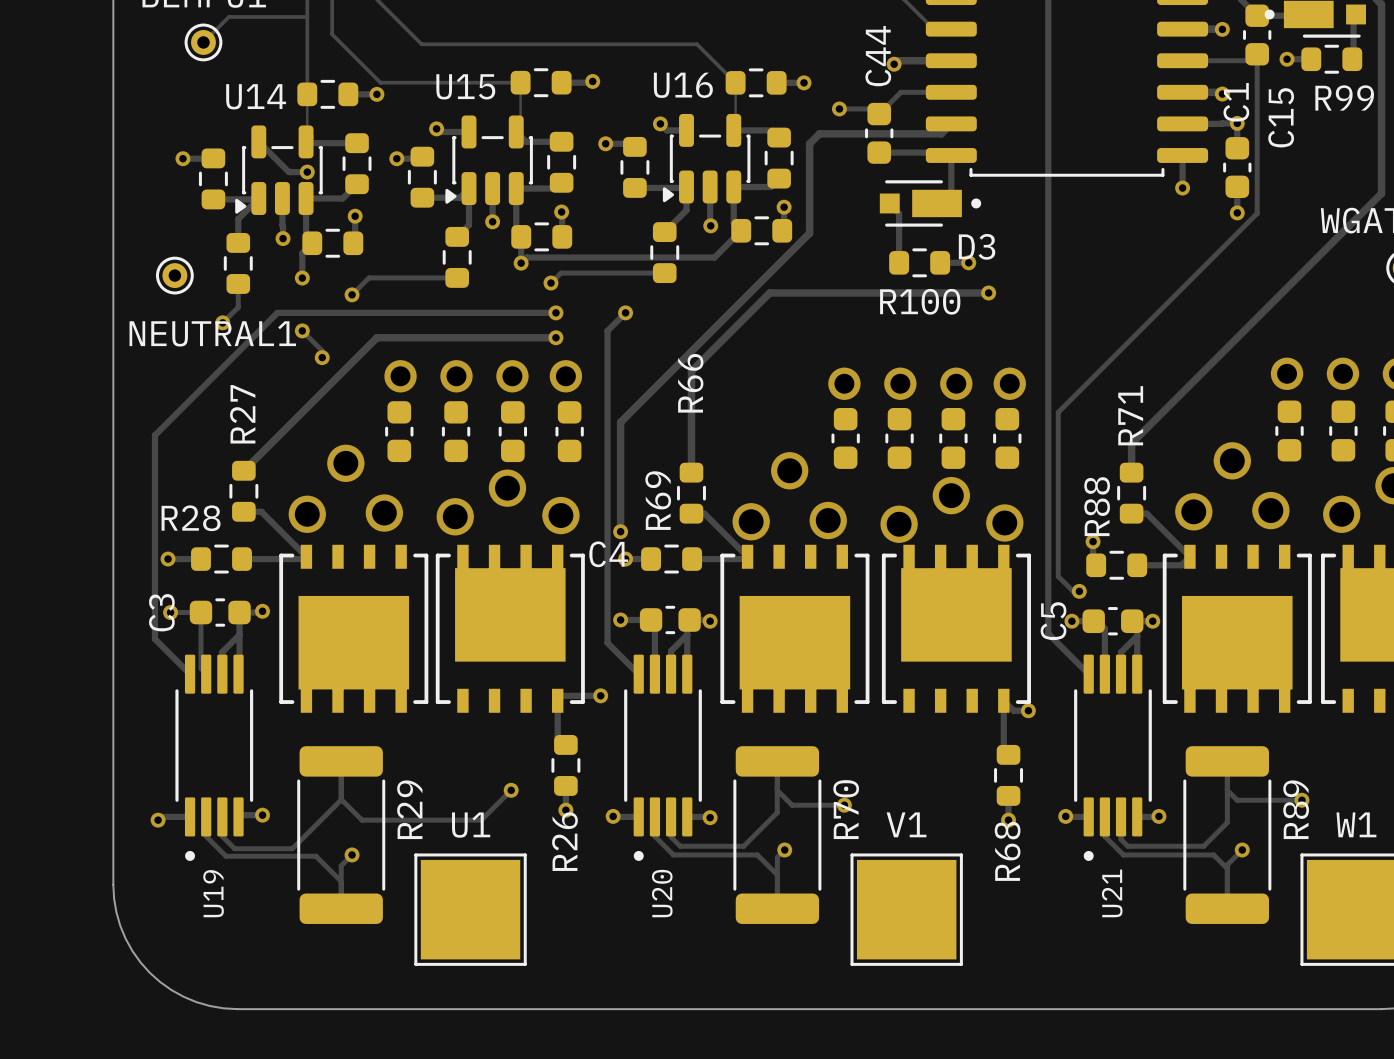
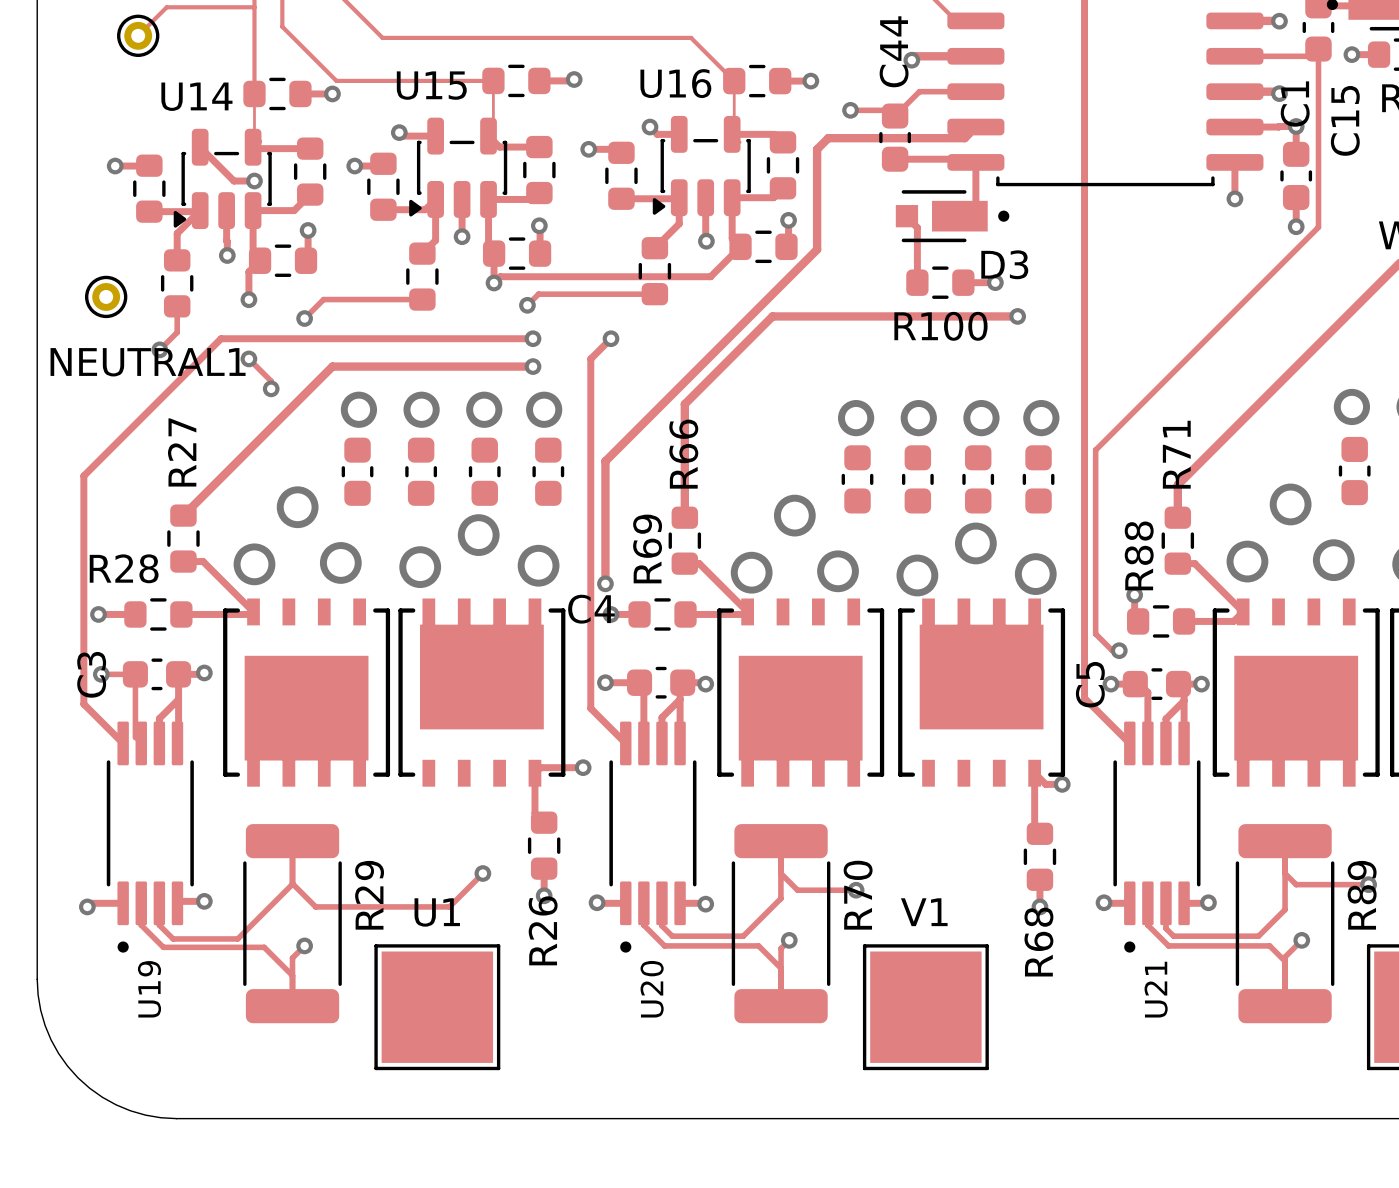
R66 name position: R66 (690, 383) -> R66 (683, 454)

